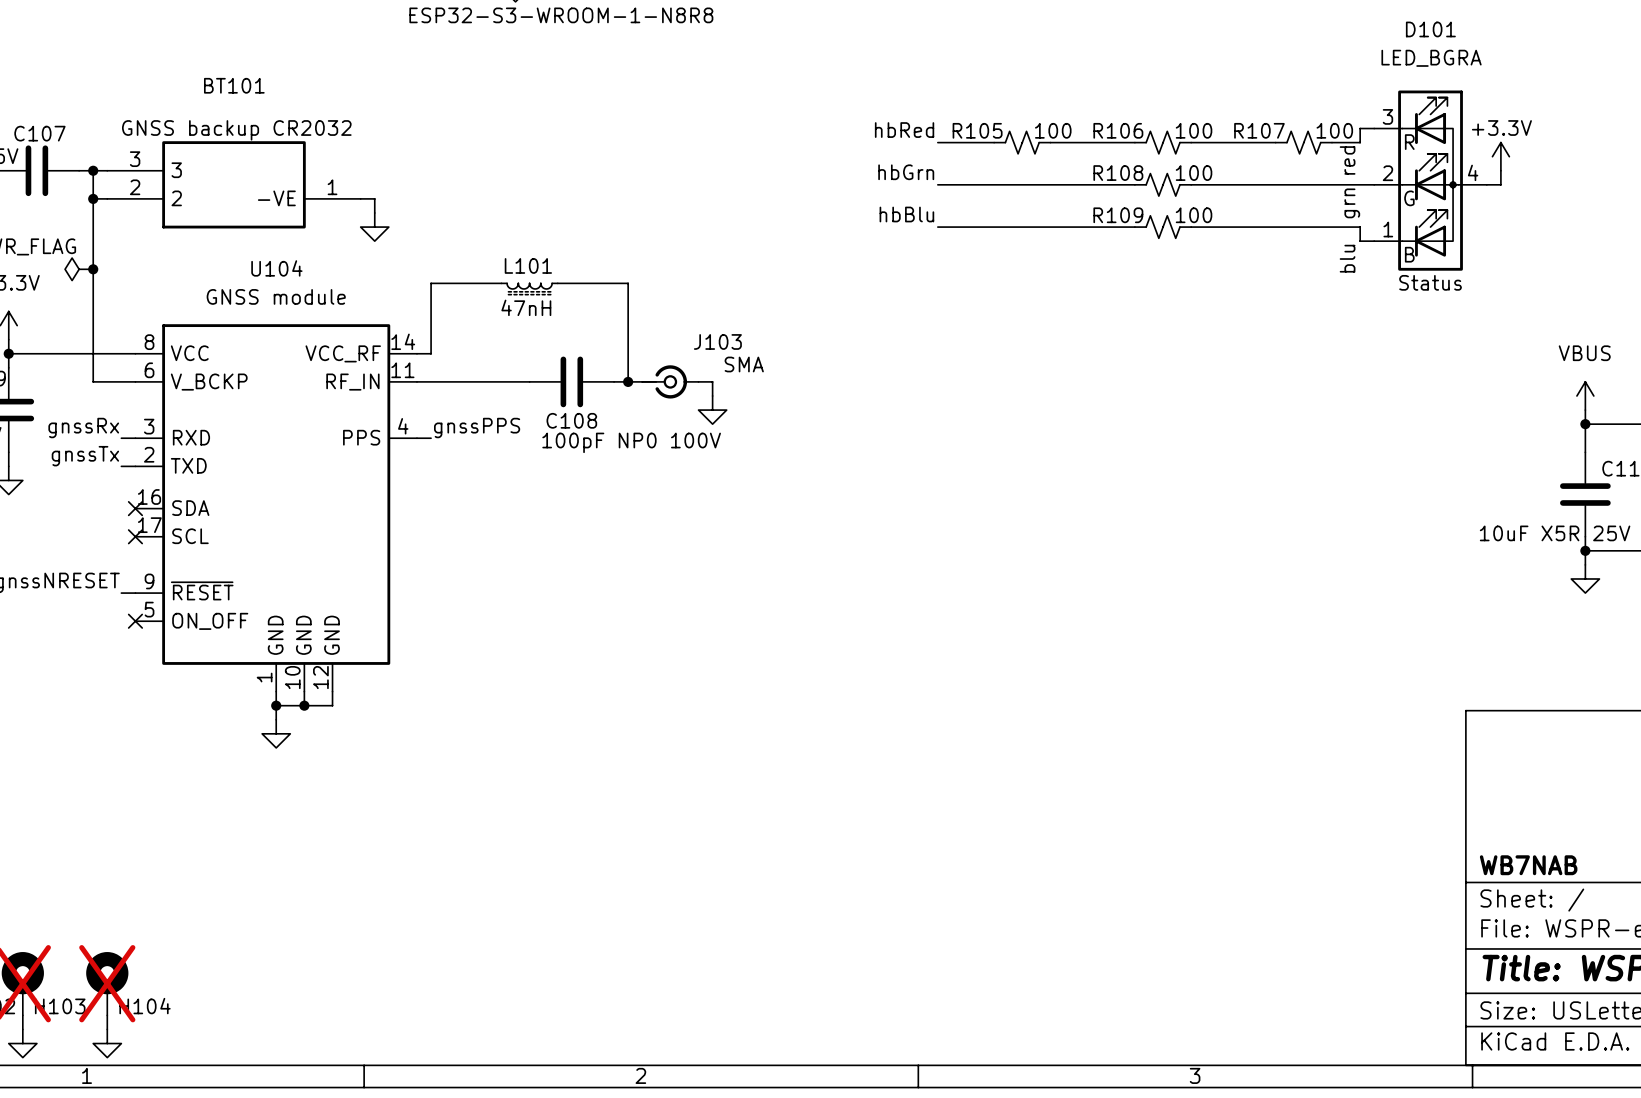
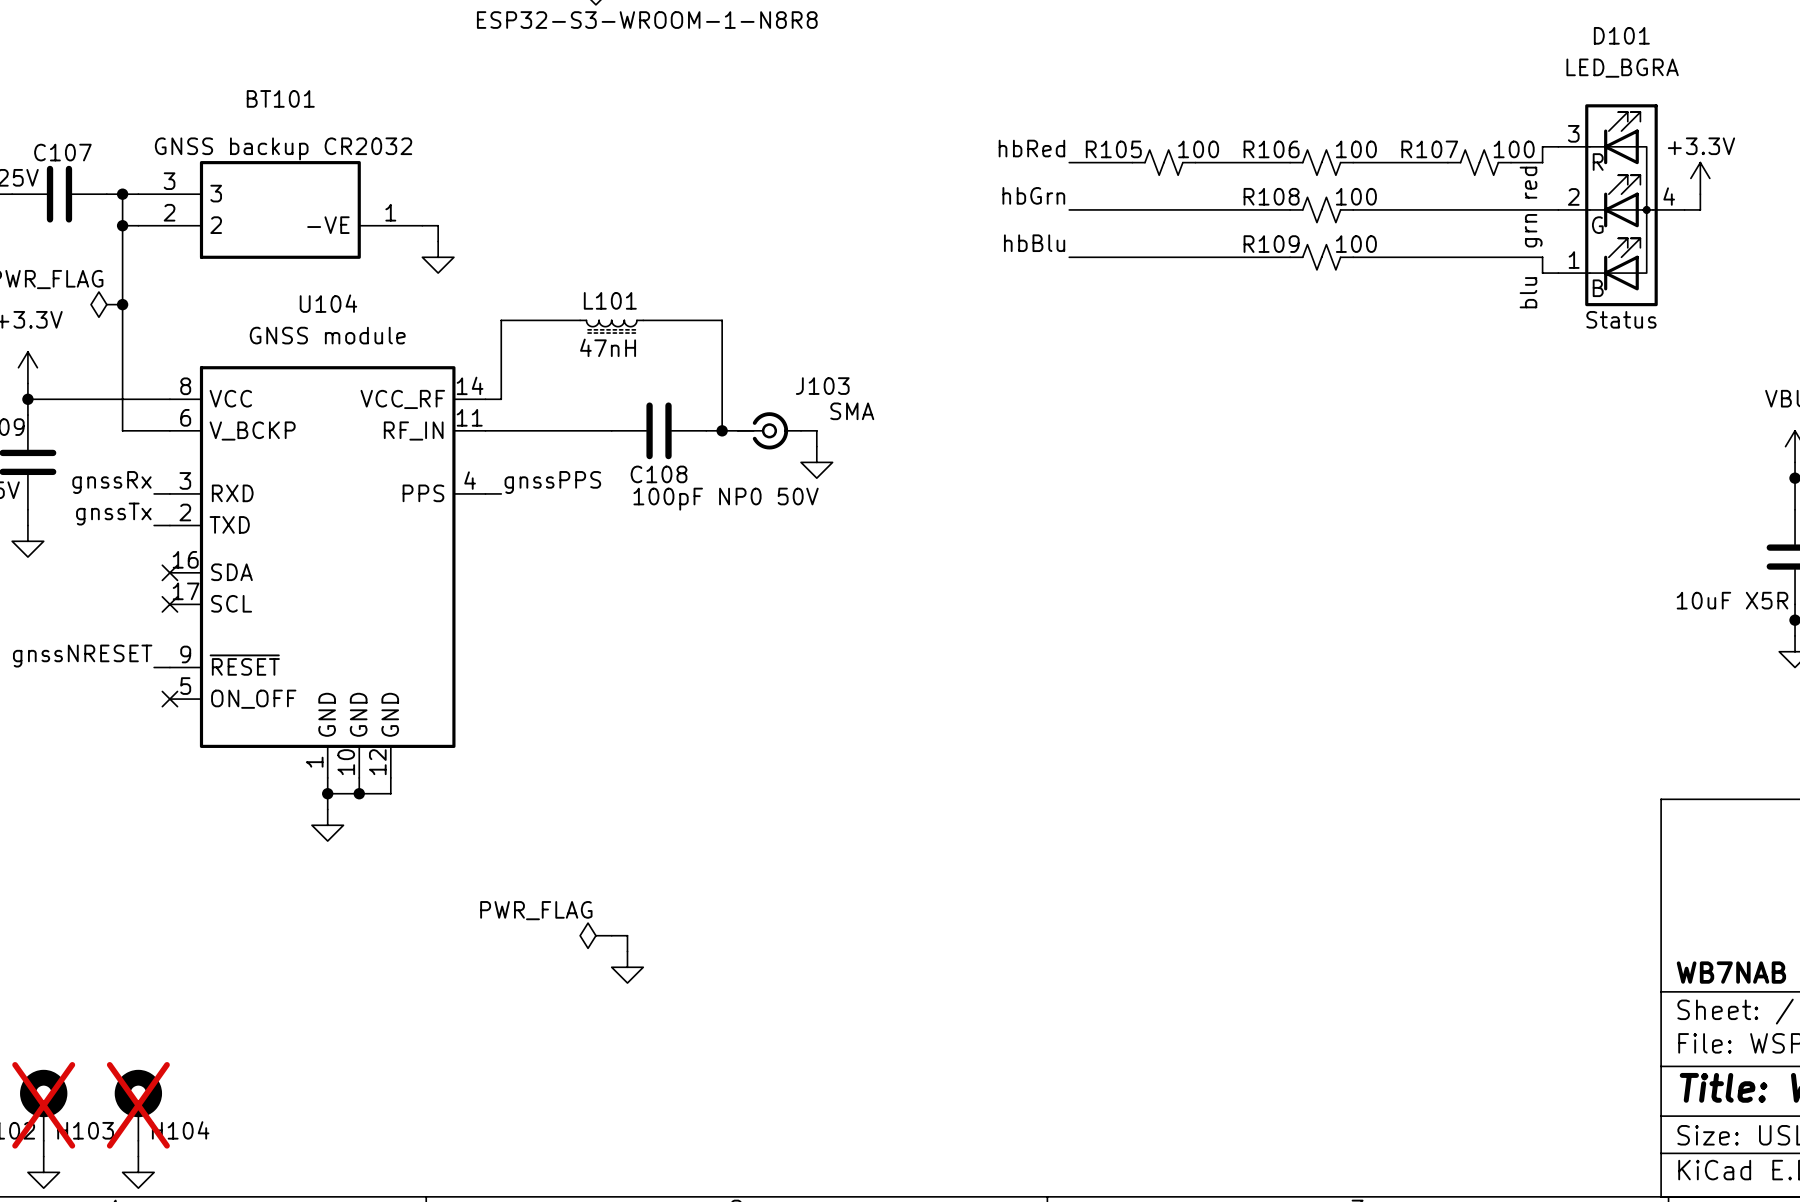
C108 value: 100pF NP0 100V (631, 442) -> 100pF NP0 50V (726, 499)
power symbol: none -> PWR_FLAG (595, 935)
wire: none -> (611, 935) (627, 935) (627, 951)
power symbol: none -> (627, 967)

